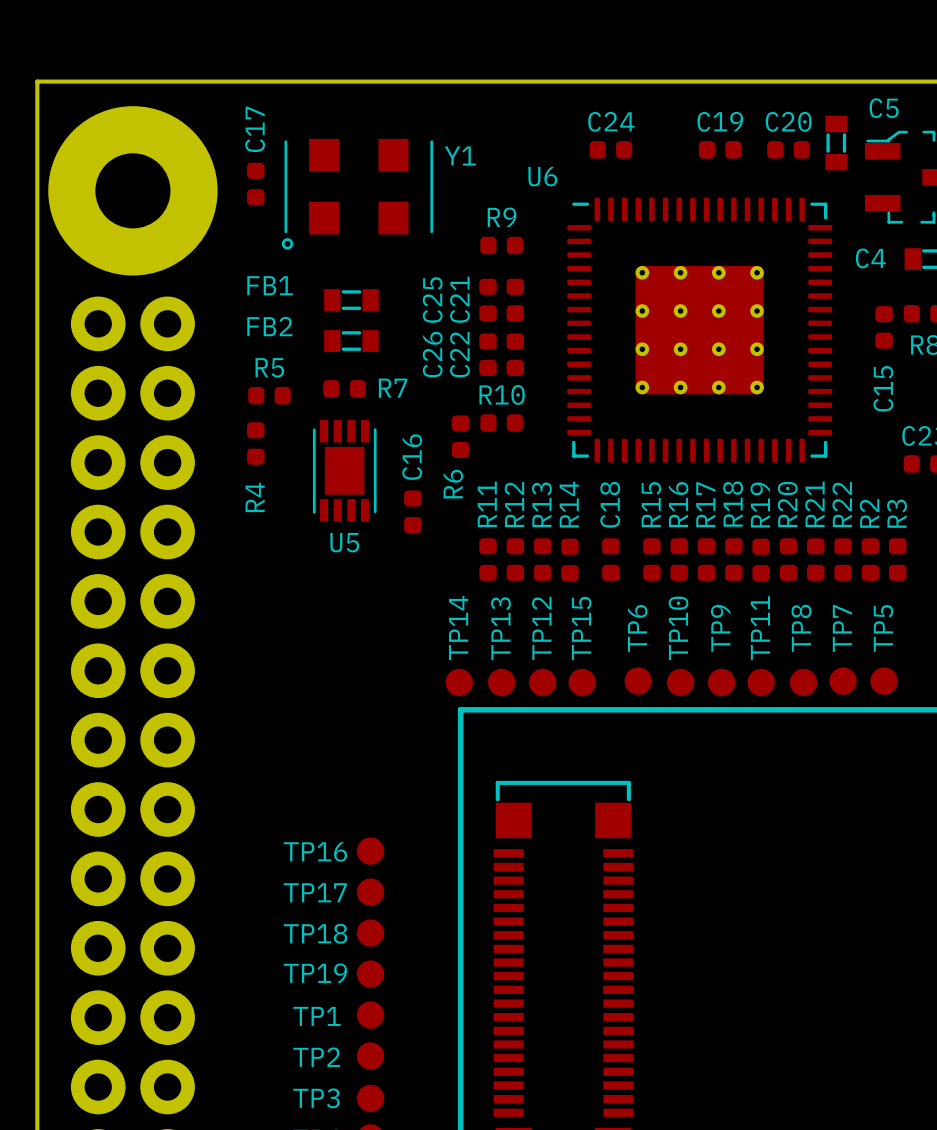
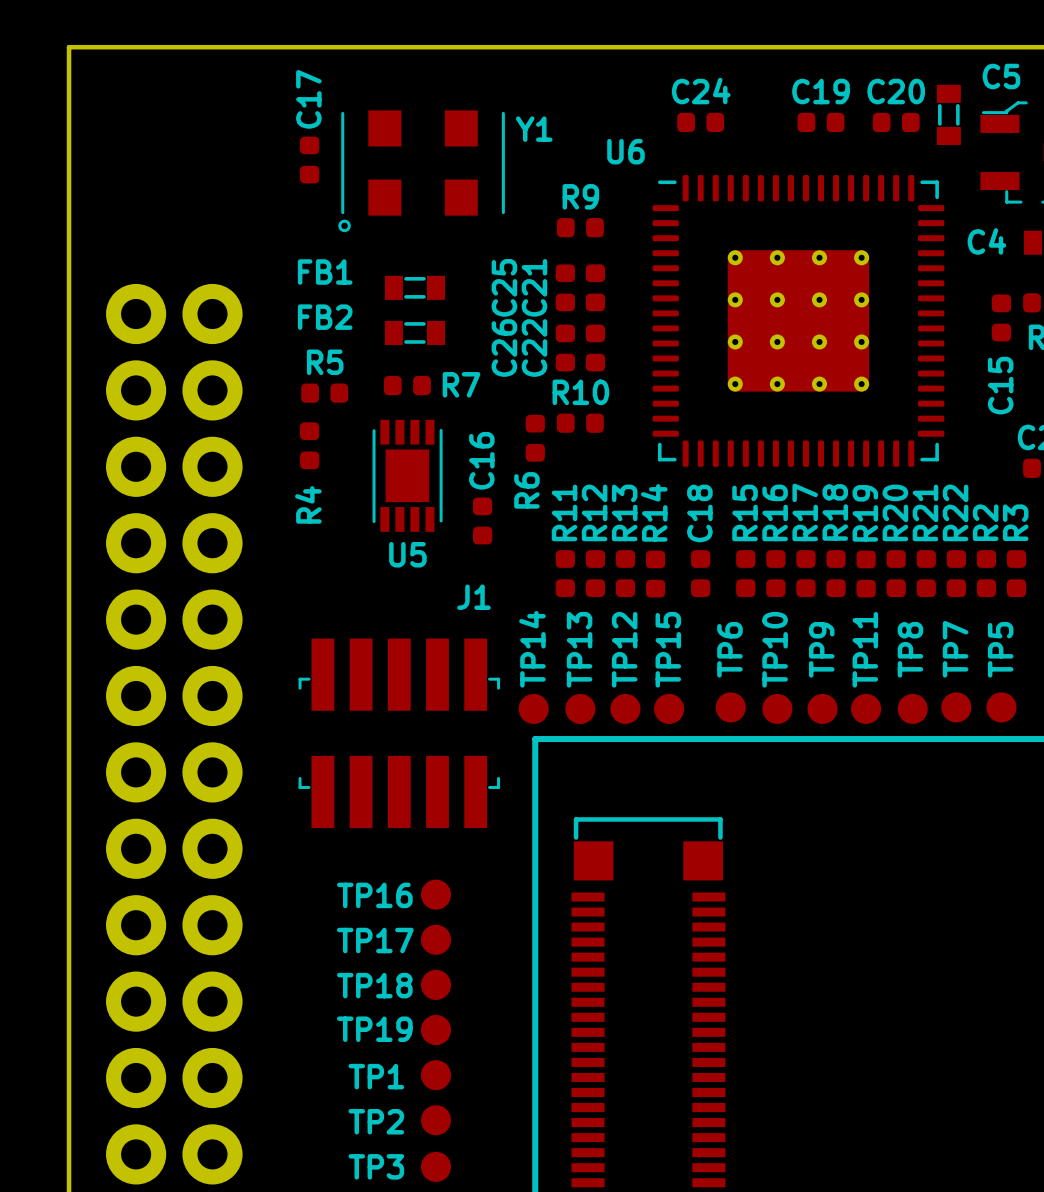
part: (132, 190) -> none
J1: none -> (399, 733)

